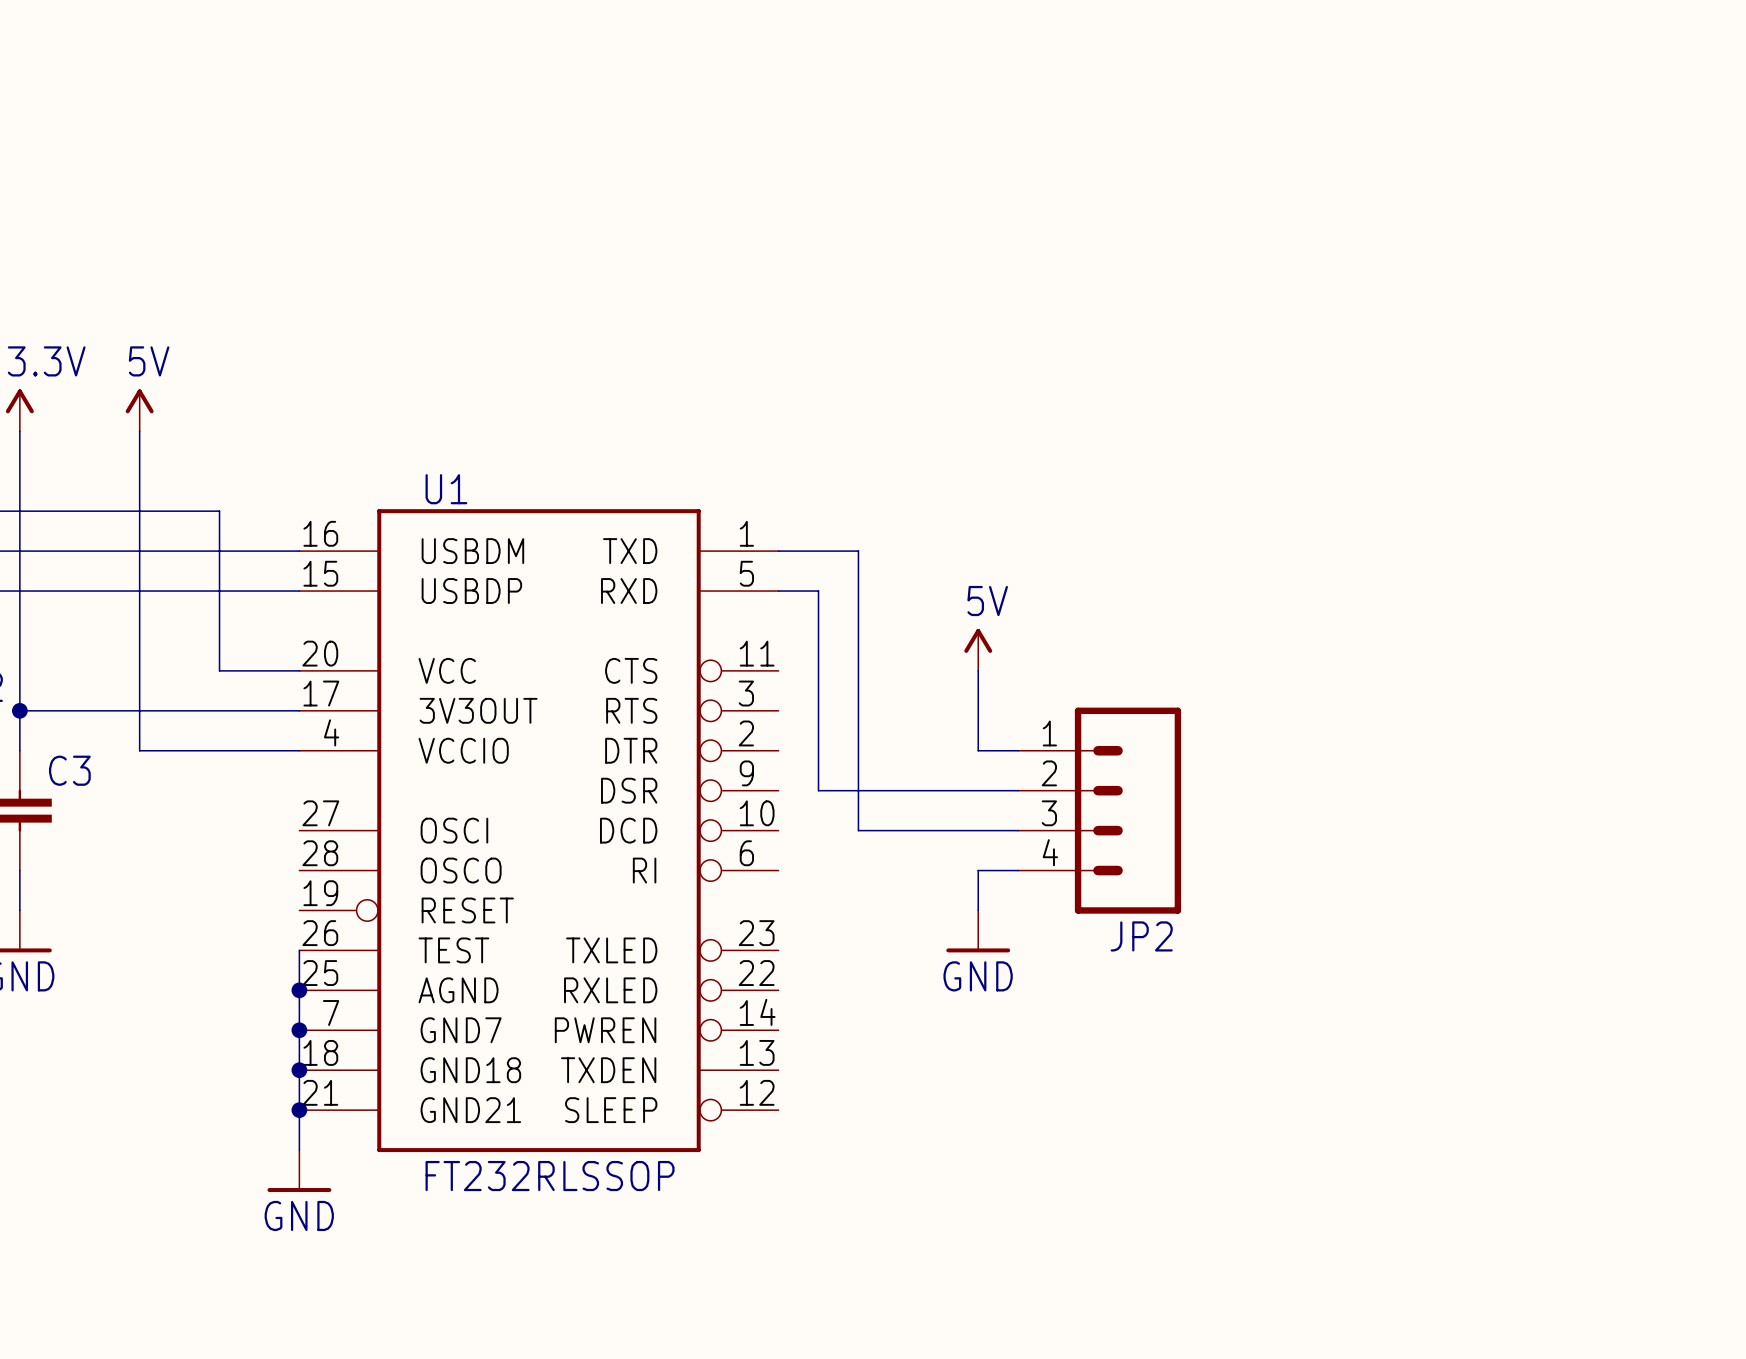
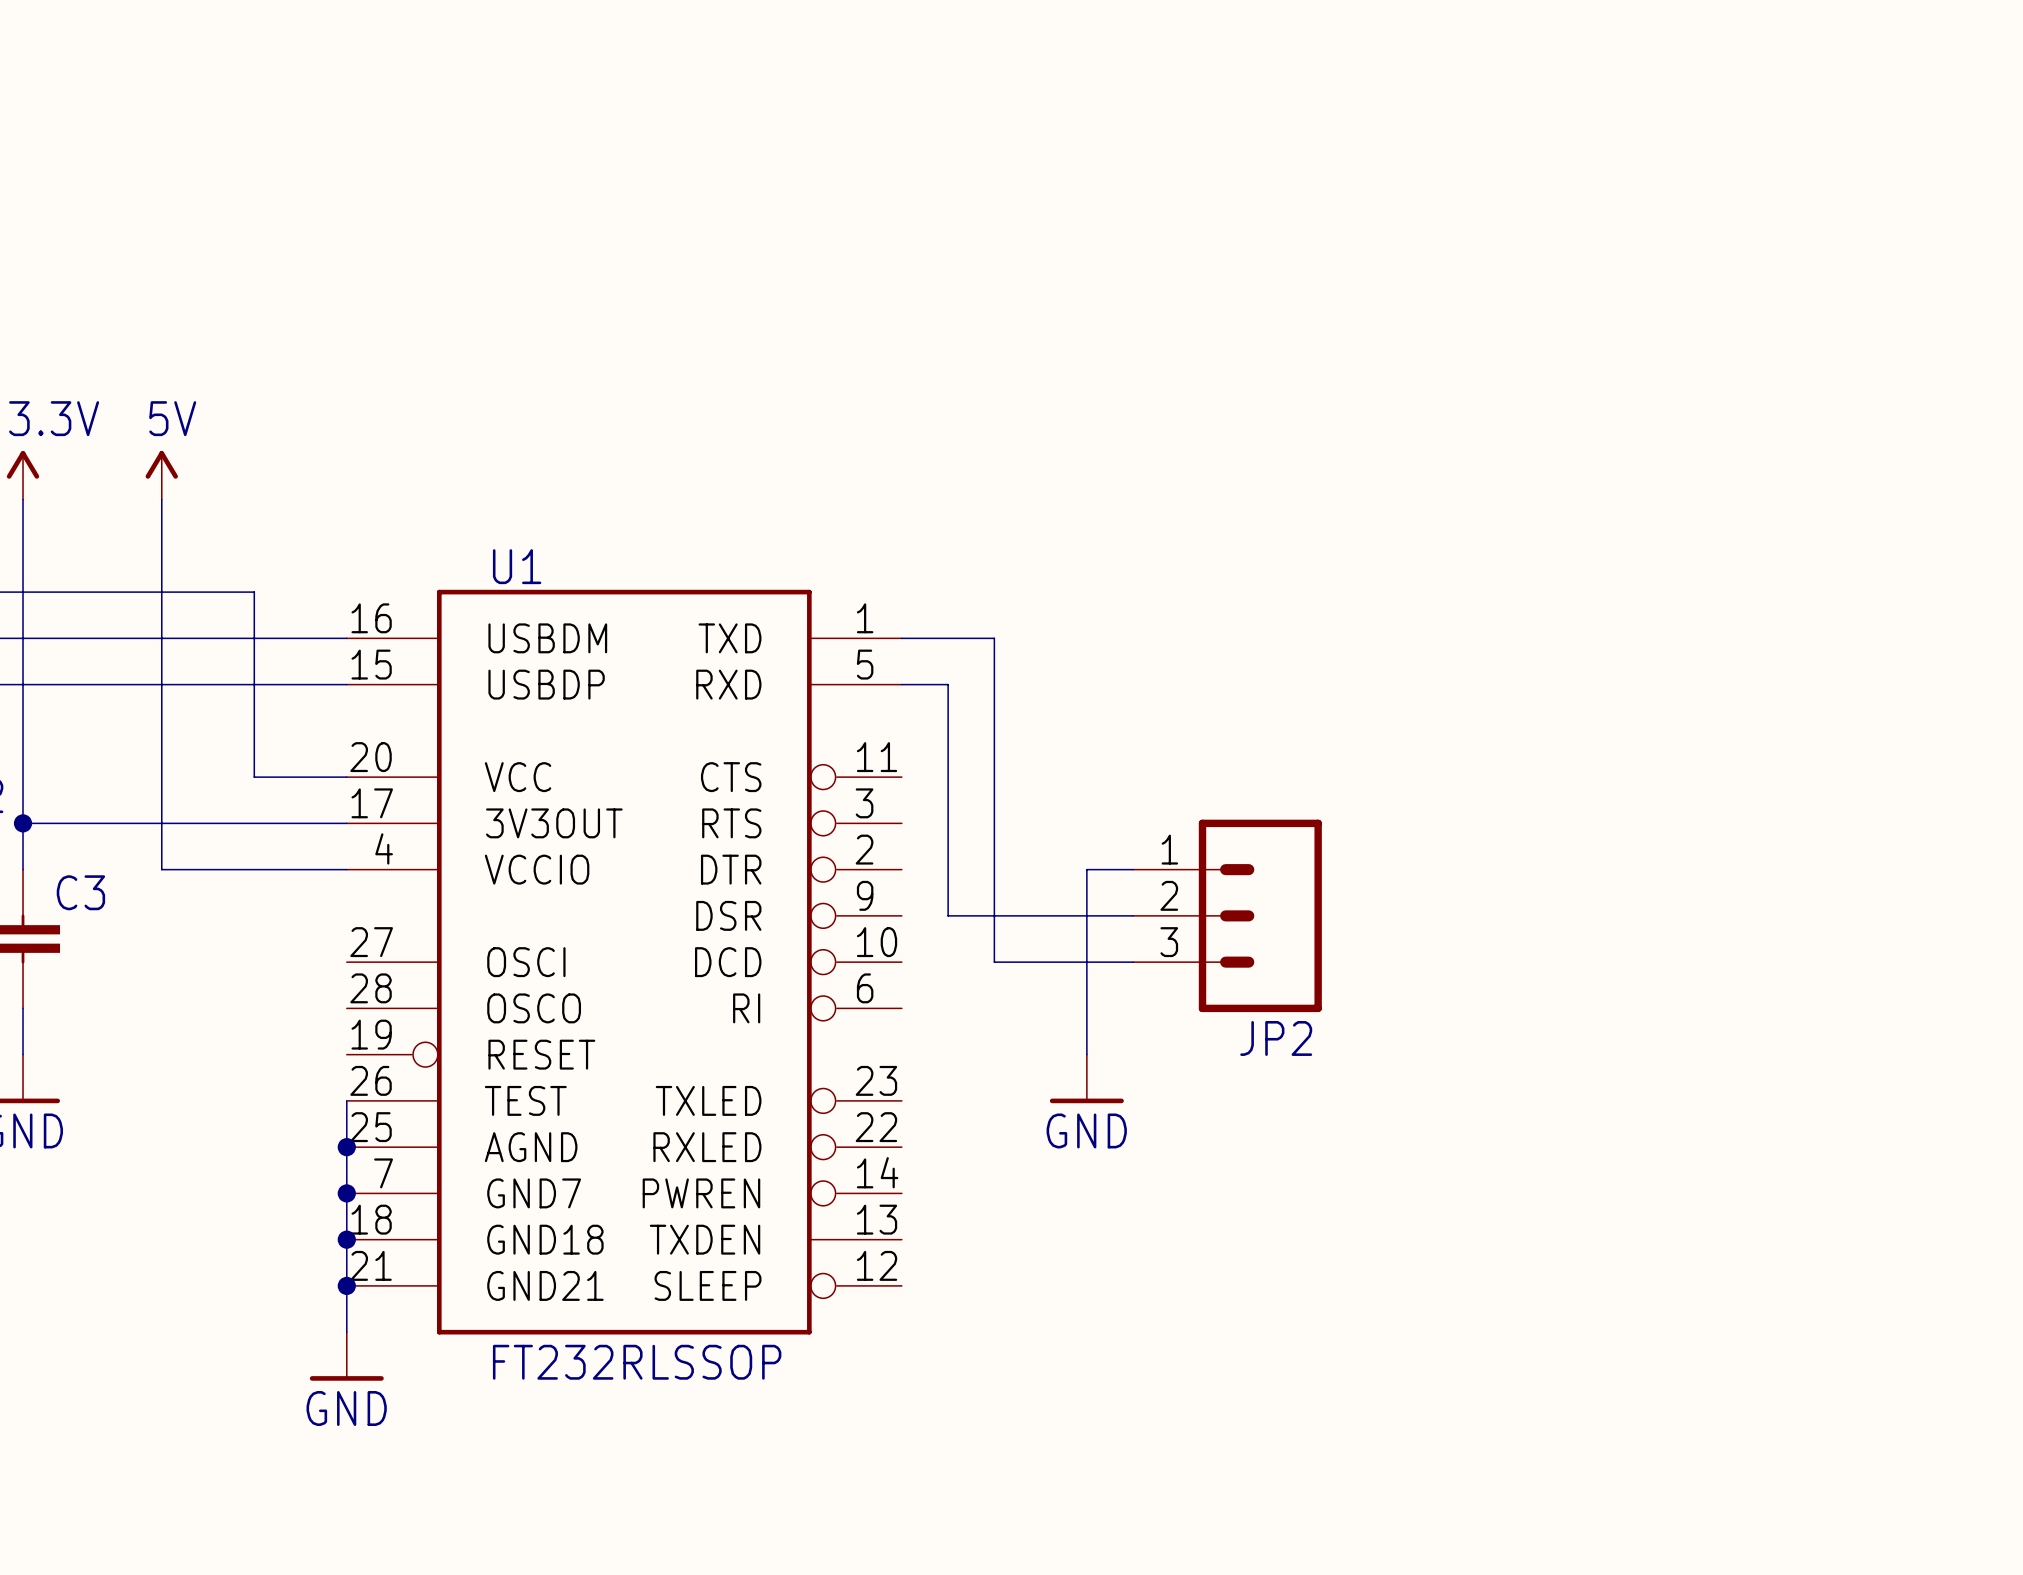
power symbol: 5V (978, 649) -> none
wire: (978, 670) (978, 750) (1018, 750) -> none
JP2 symbol: [1018, 707, 1182, 914] -> [1133, 819, 1322, 1013]
wire: none -> (1133, 869) (1086, 869) (1086, 1054)
wire: (1018, 870) (978, 870) (978, 910) -> none
power symbol position: GND (978, 931) -> GND (1086, 1078)

